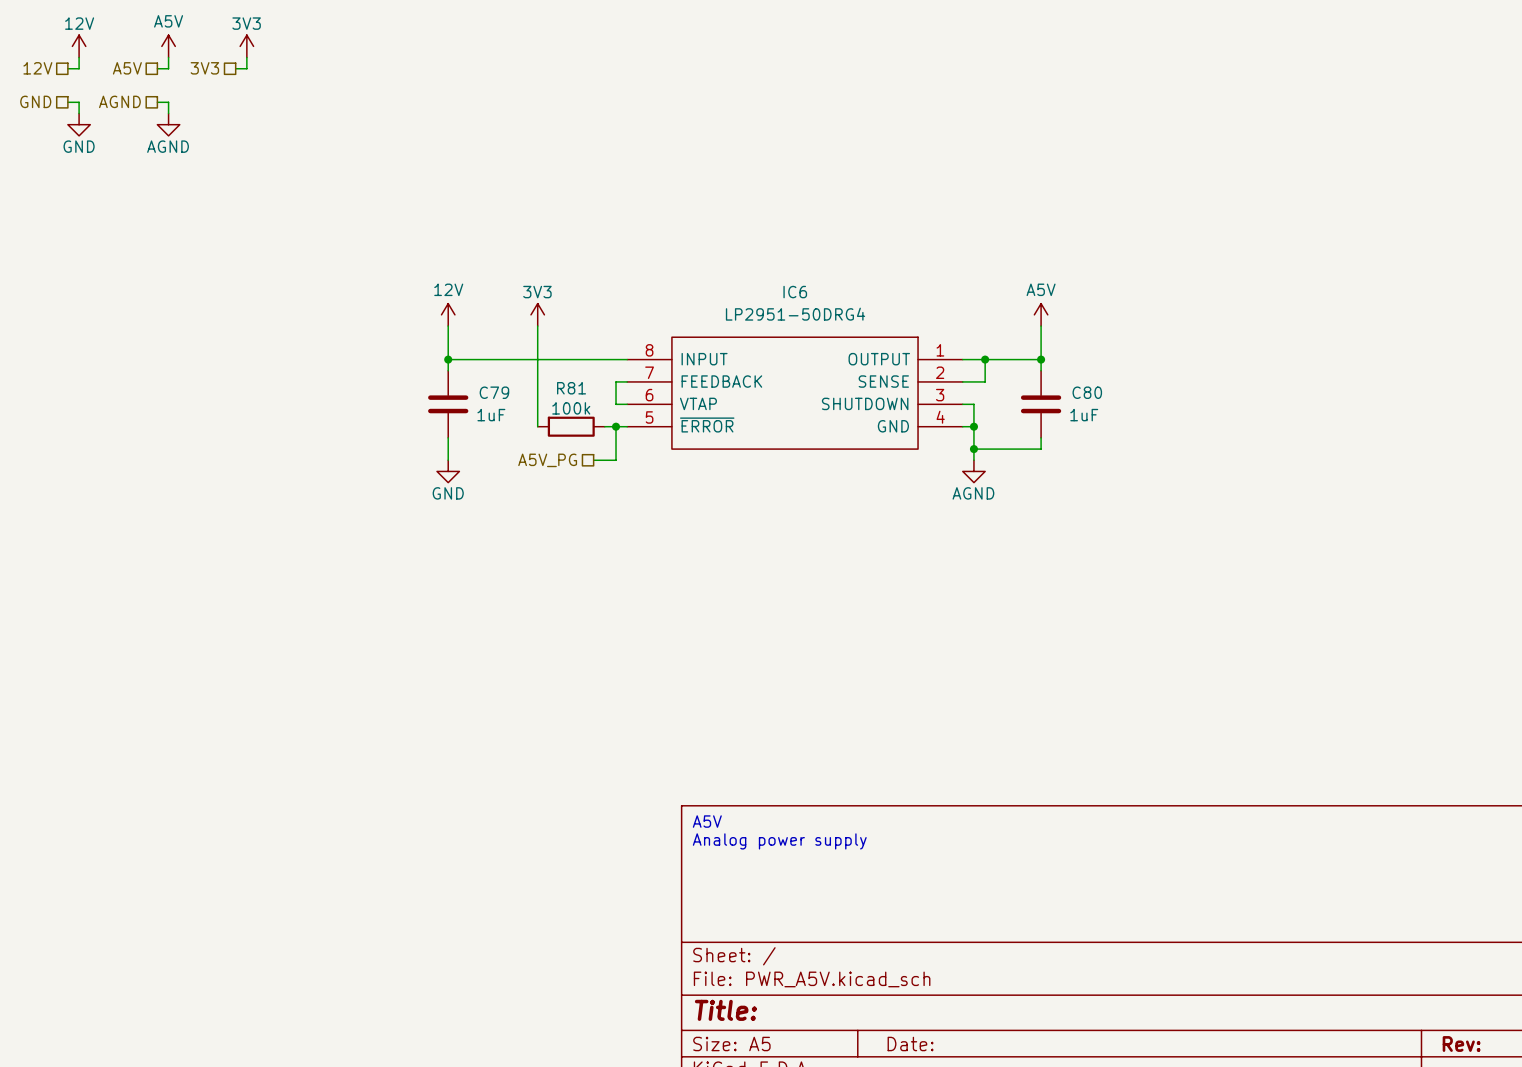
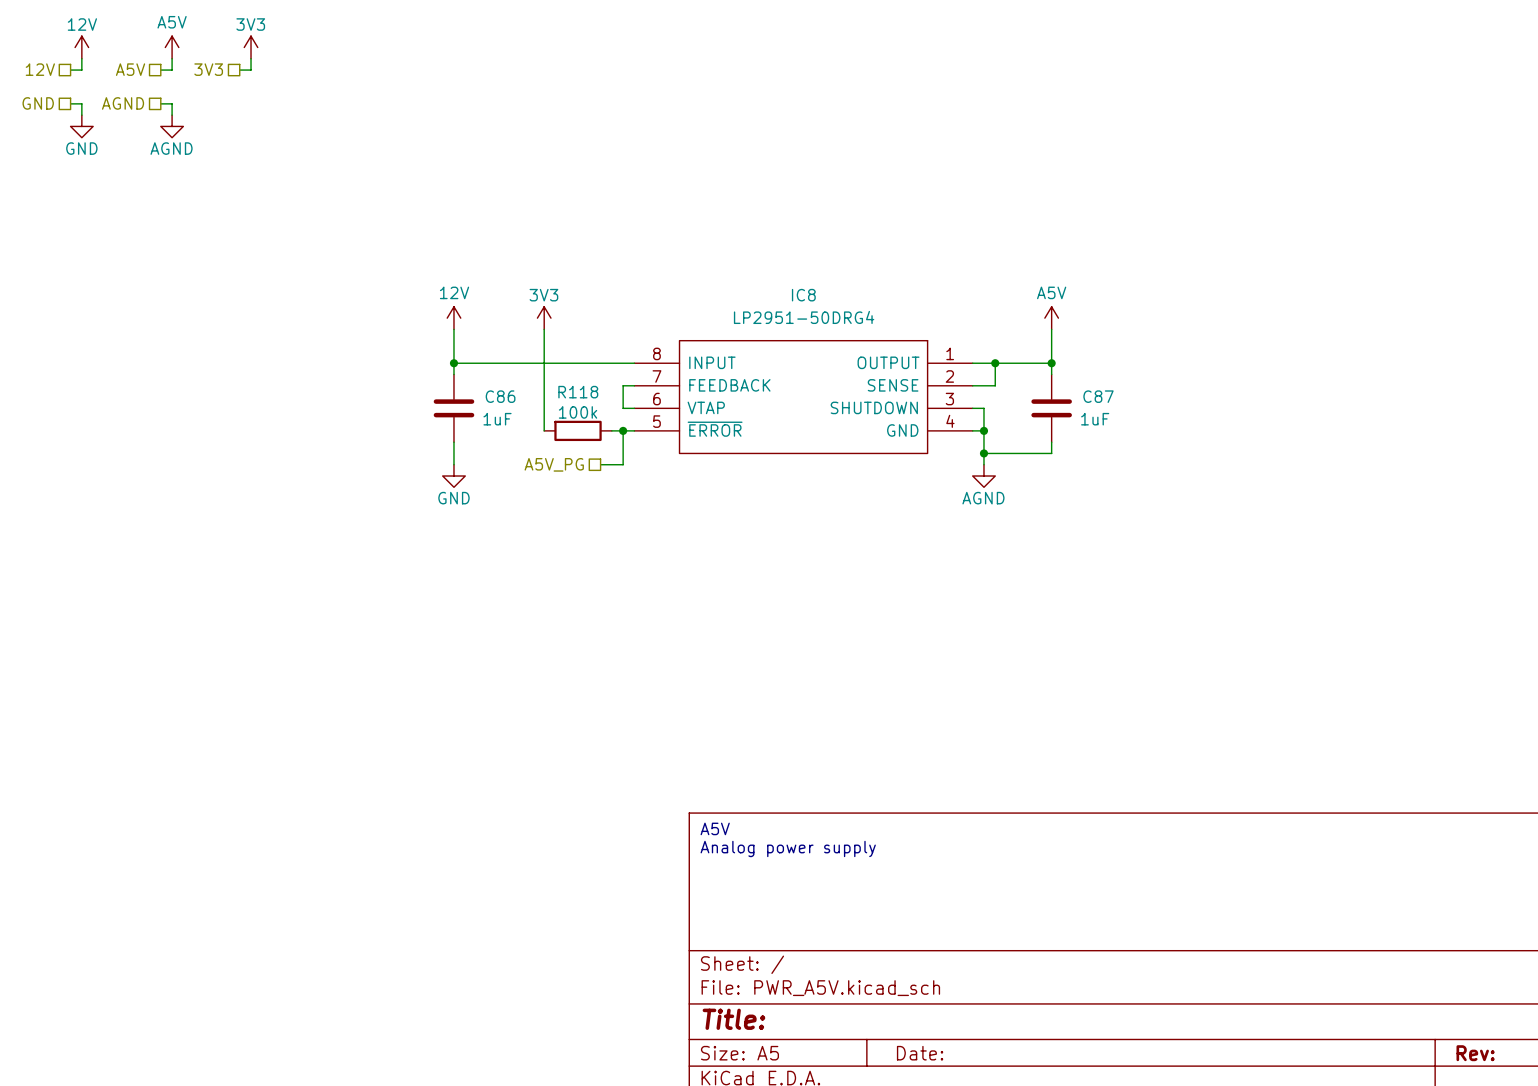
IC6 name: IC6 (795, 292) -> IC8 (803, 295)
R81 name: R81 (571, 388) -> R118 (578, 392)
C79 name: C79 (494, 392) -> C86 (500, 396)
C80 name: C80 (1087, 392) -> C87 (1098, 396)

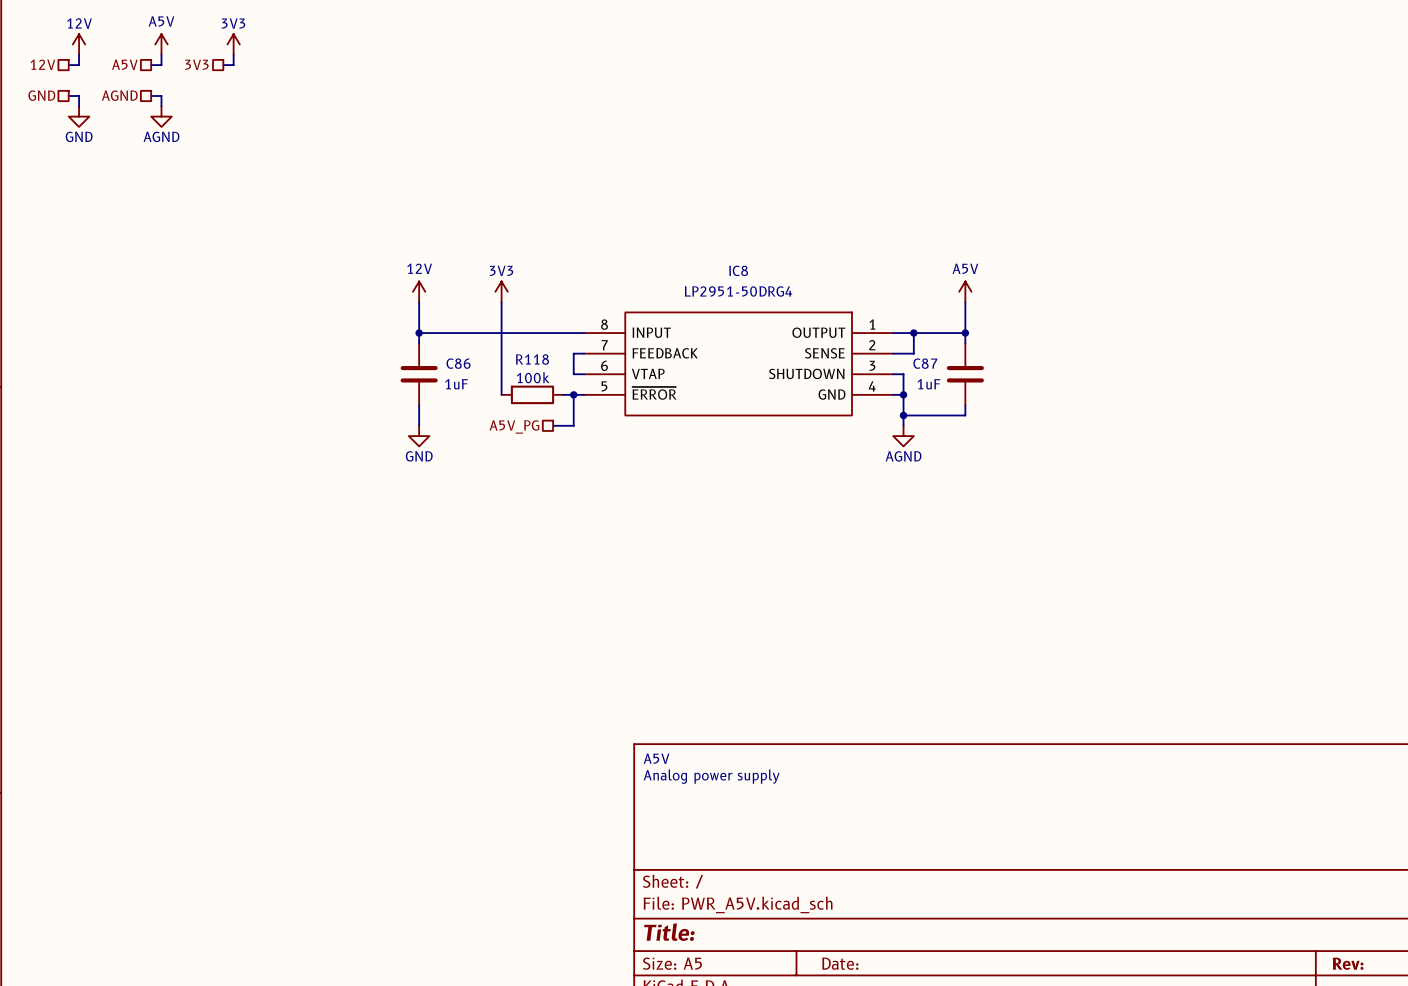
C87 name position: C87 (1098, 396) -> C87 (925, 363)
C87 value position: 1uF (1095, 419) -> 1uF (928, 384)

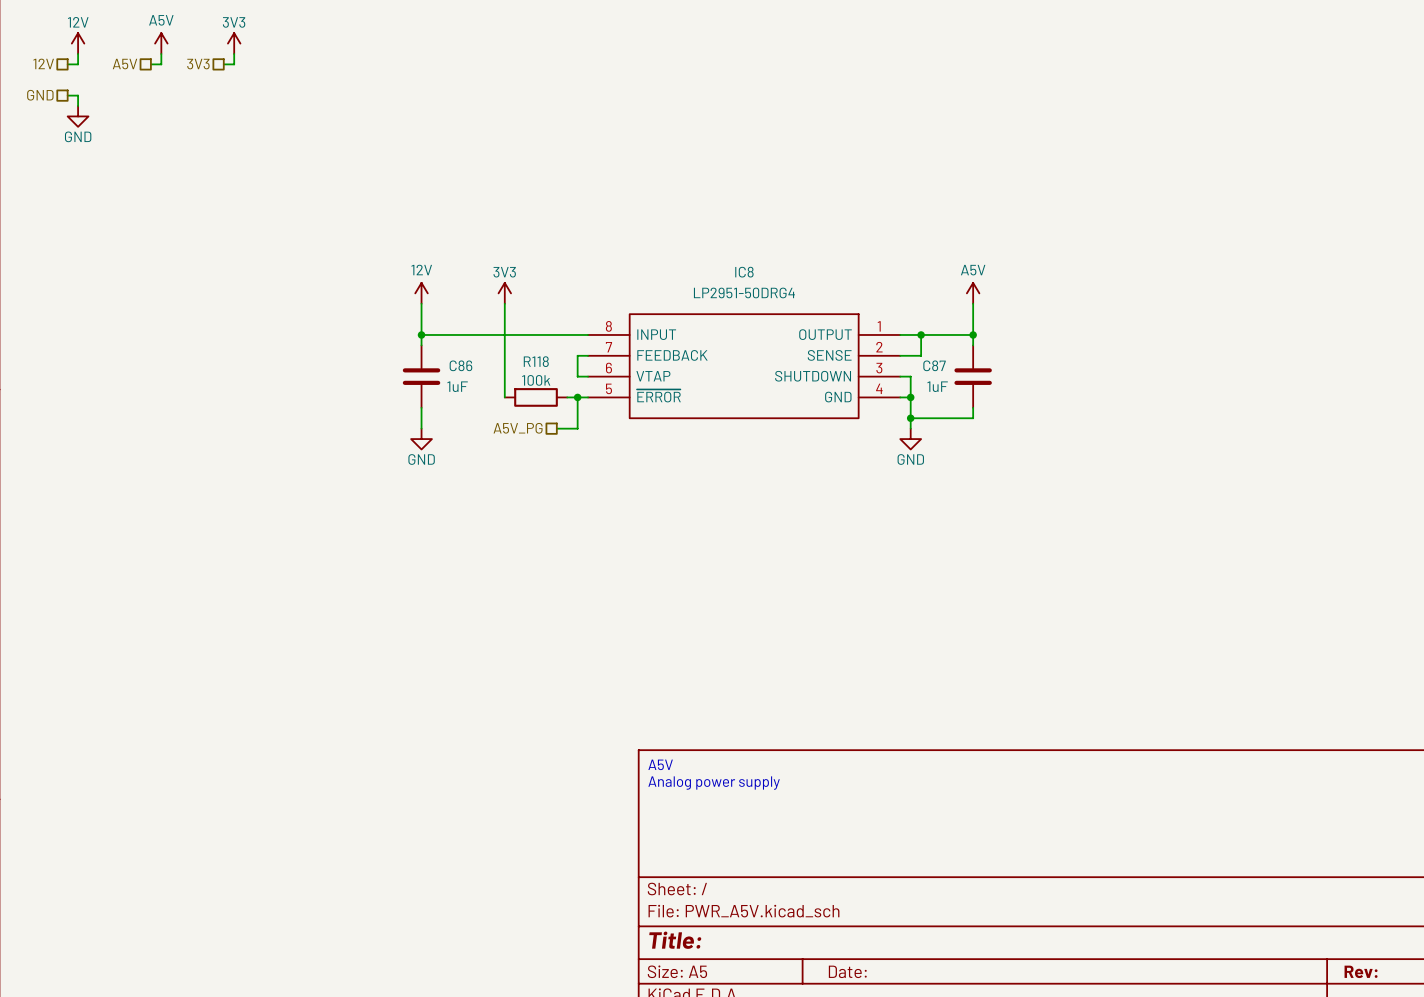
hierarchical label: AGND (119, 95) -> none
wire: (151, 95) (161, 95) (161, 106) -> none
power symbol: AGND (161, 116) -> none
power symbol: AGND (903, 436) -> GND (910, 439)

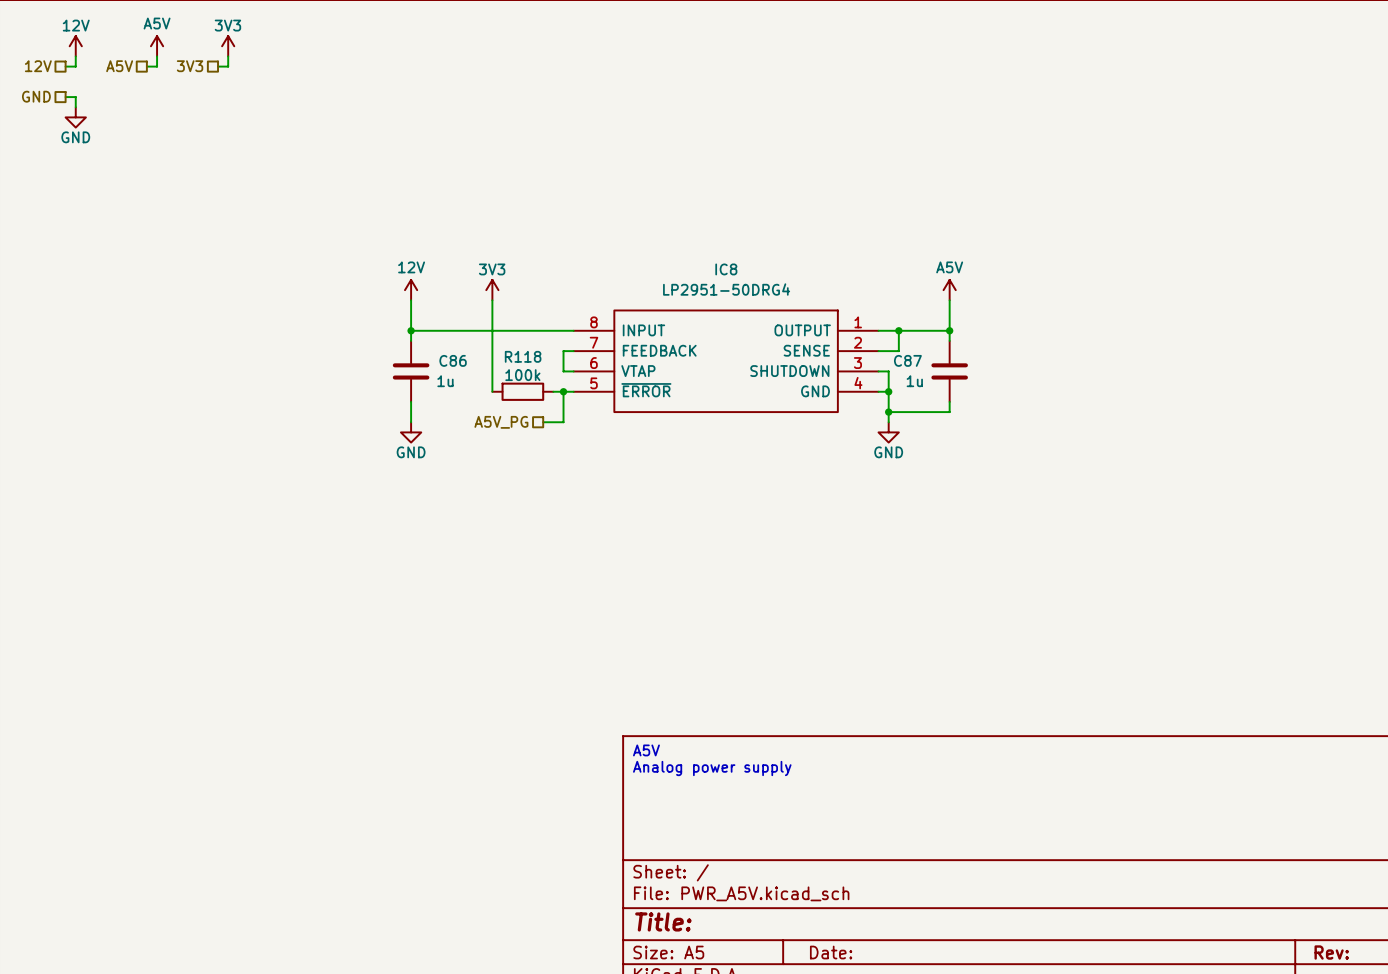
C86 value: 1uF (457, 386) -> 1u (445, 381)
C87 value: 1uF (937, 386) -> 1u (914, 381)

